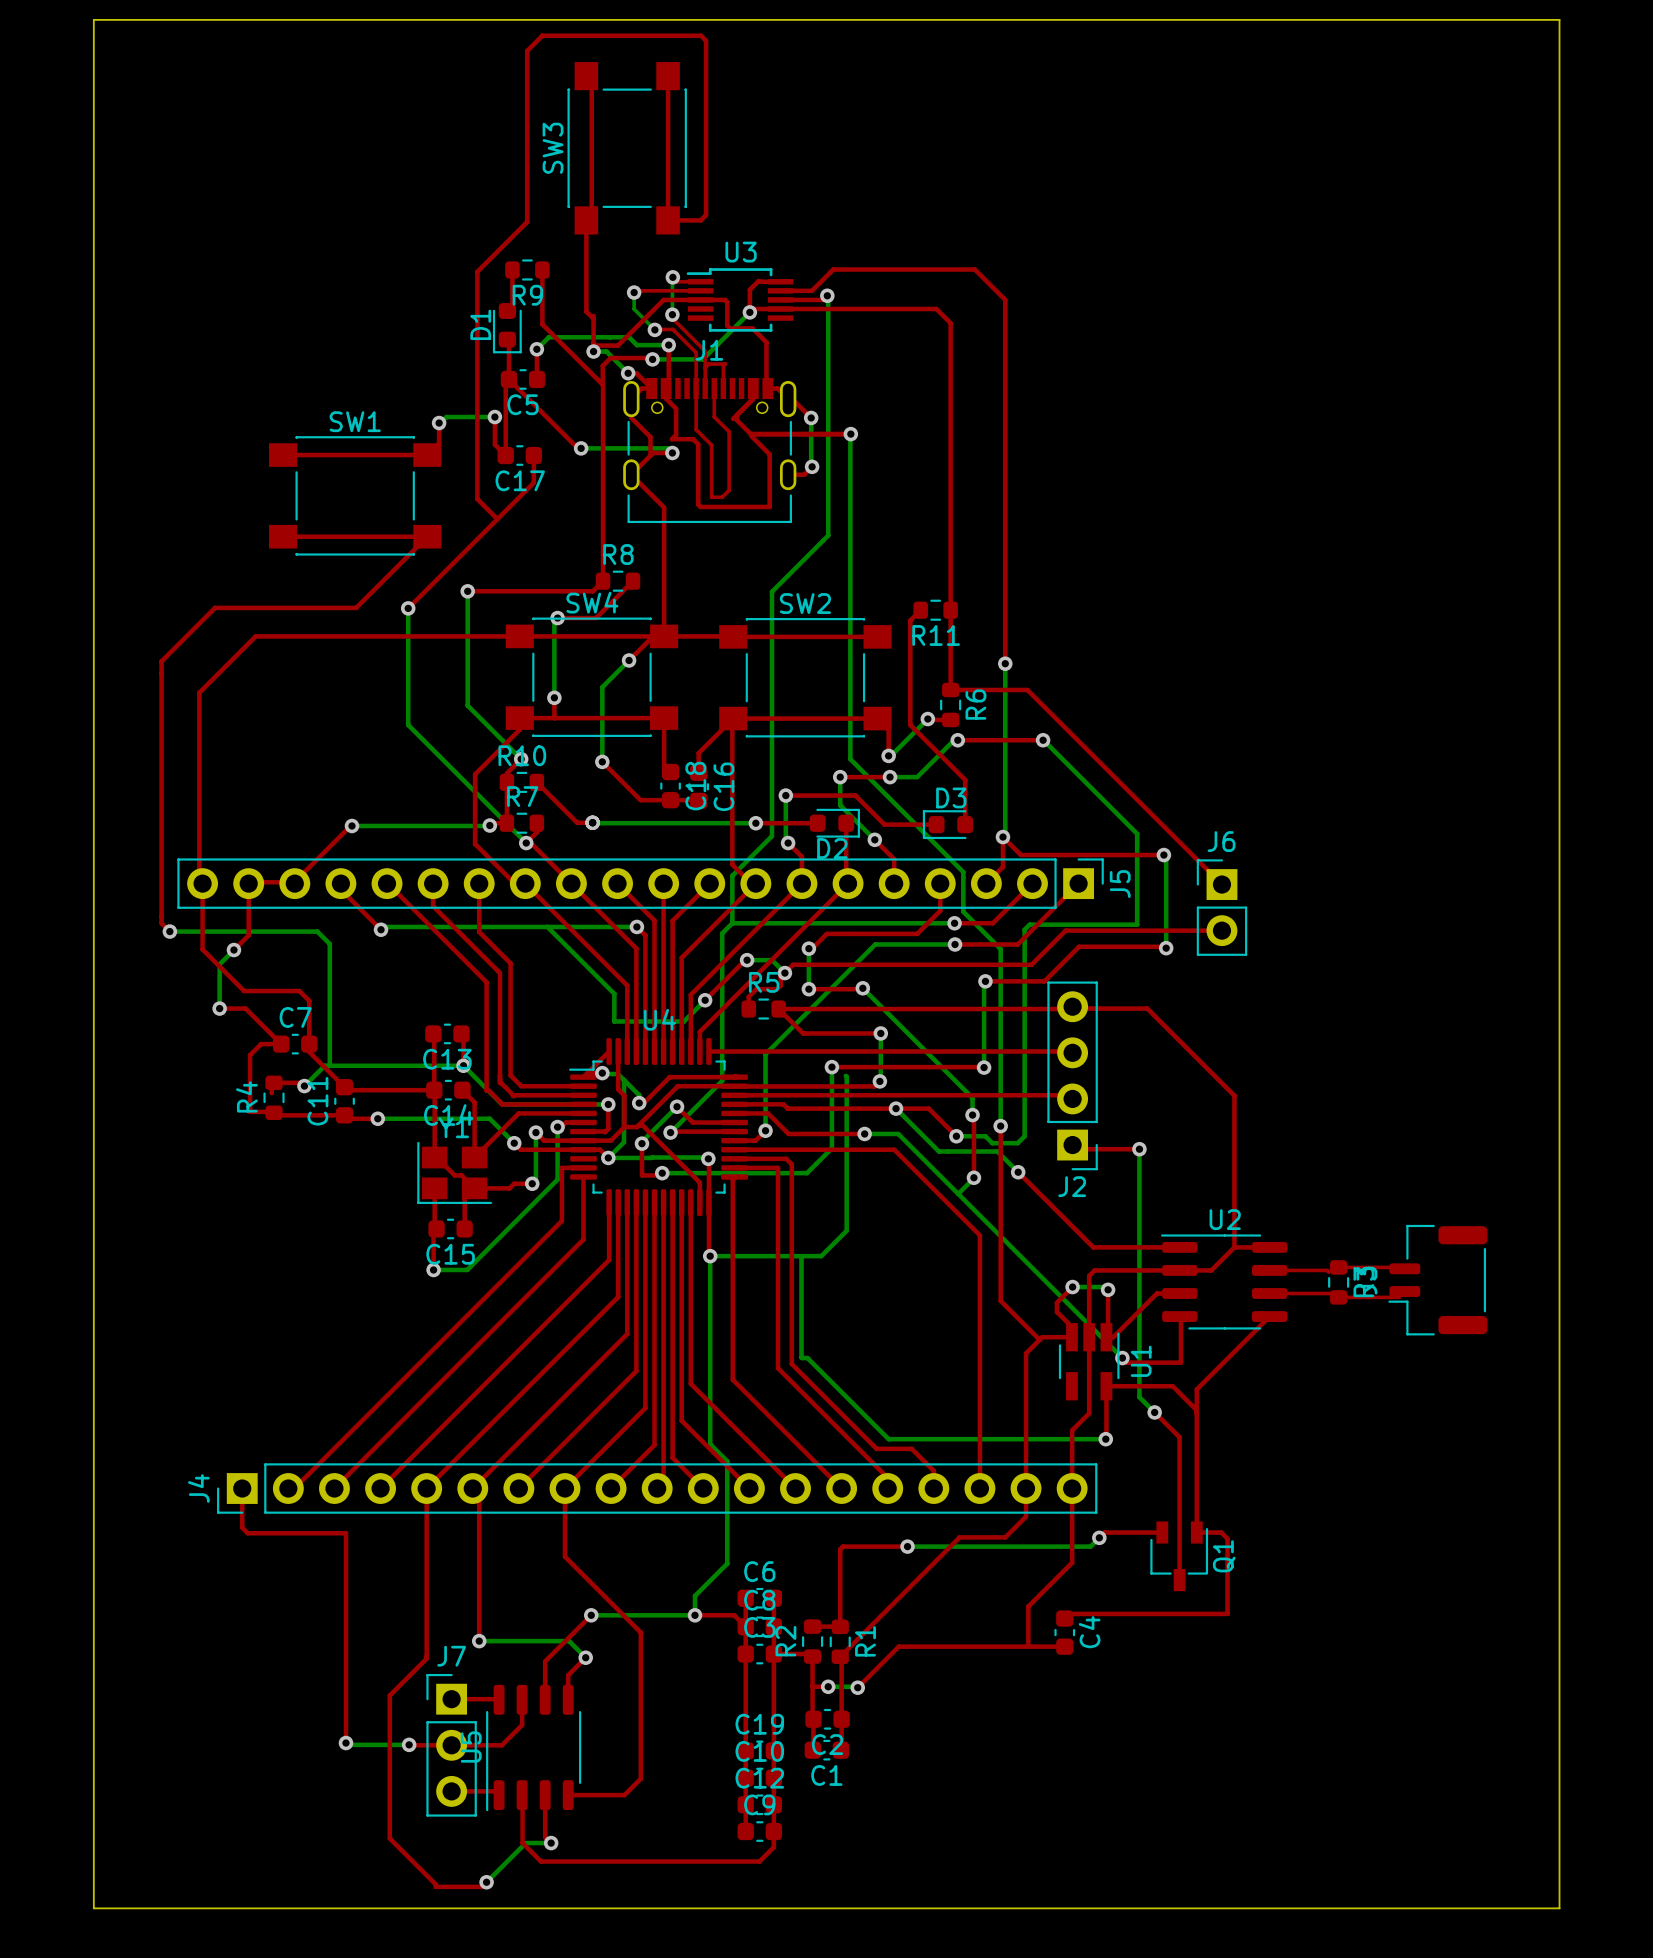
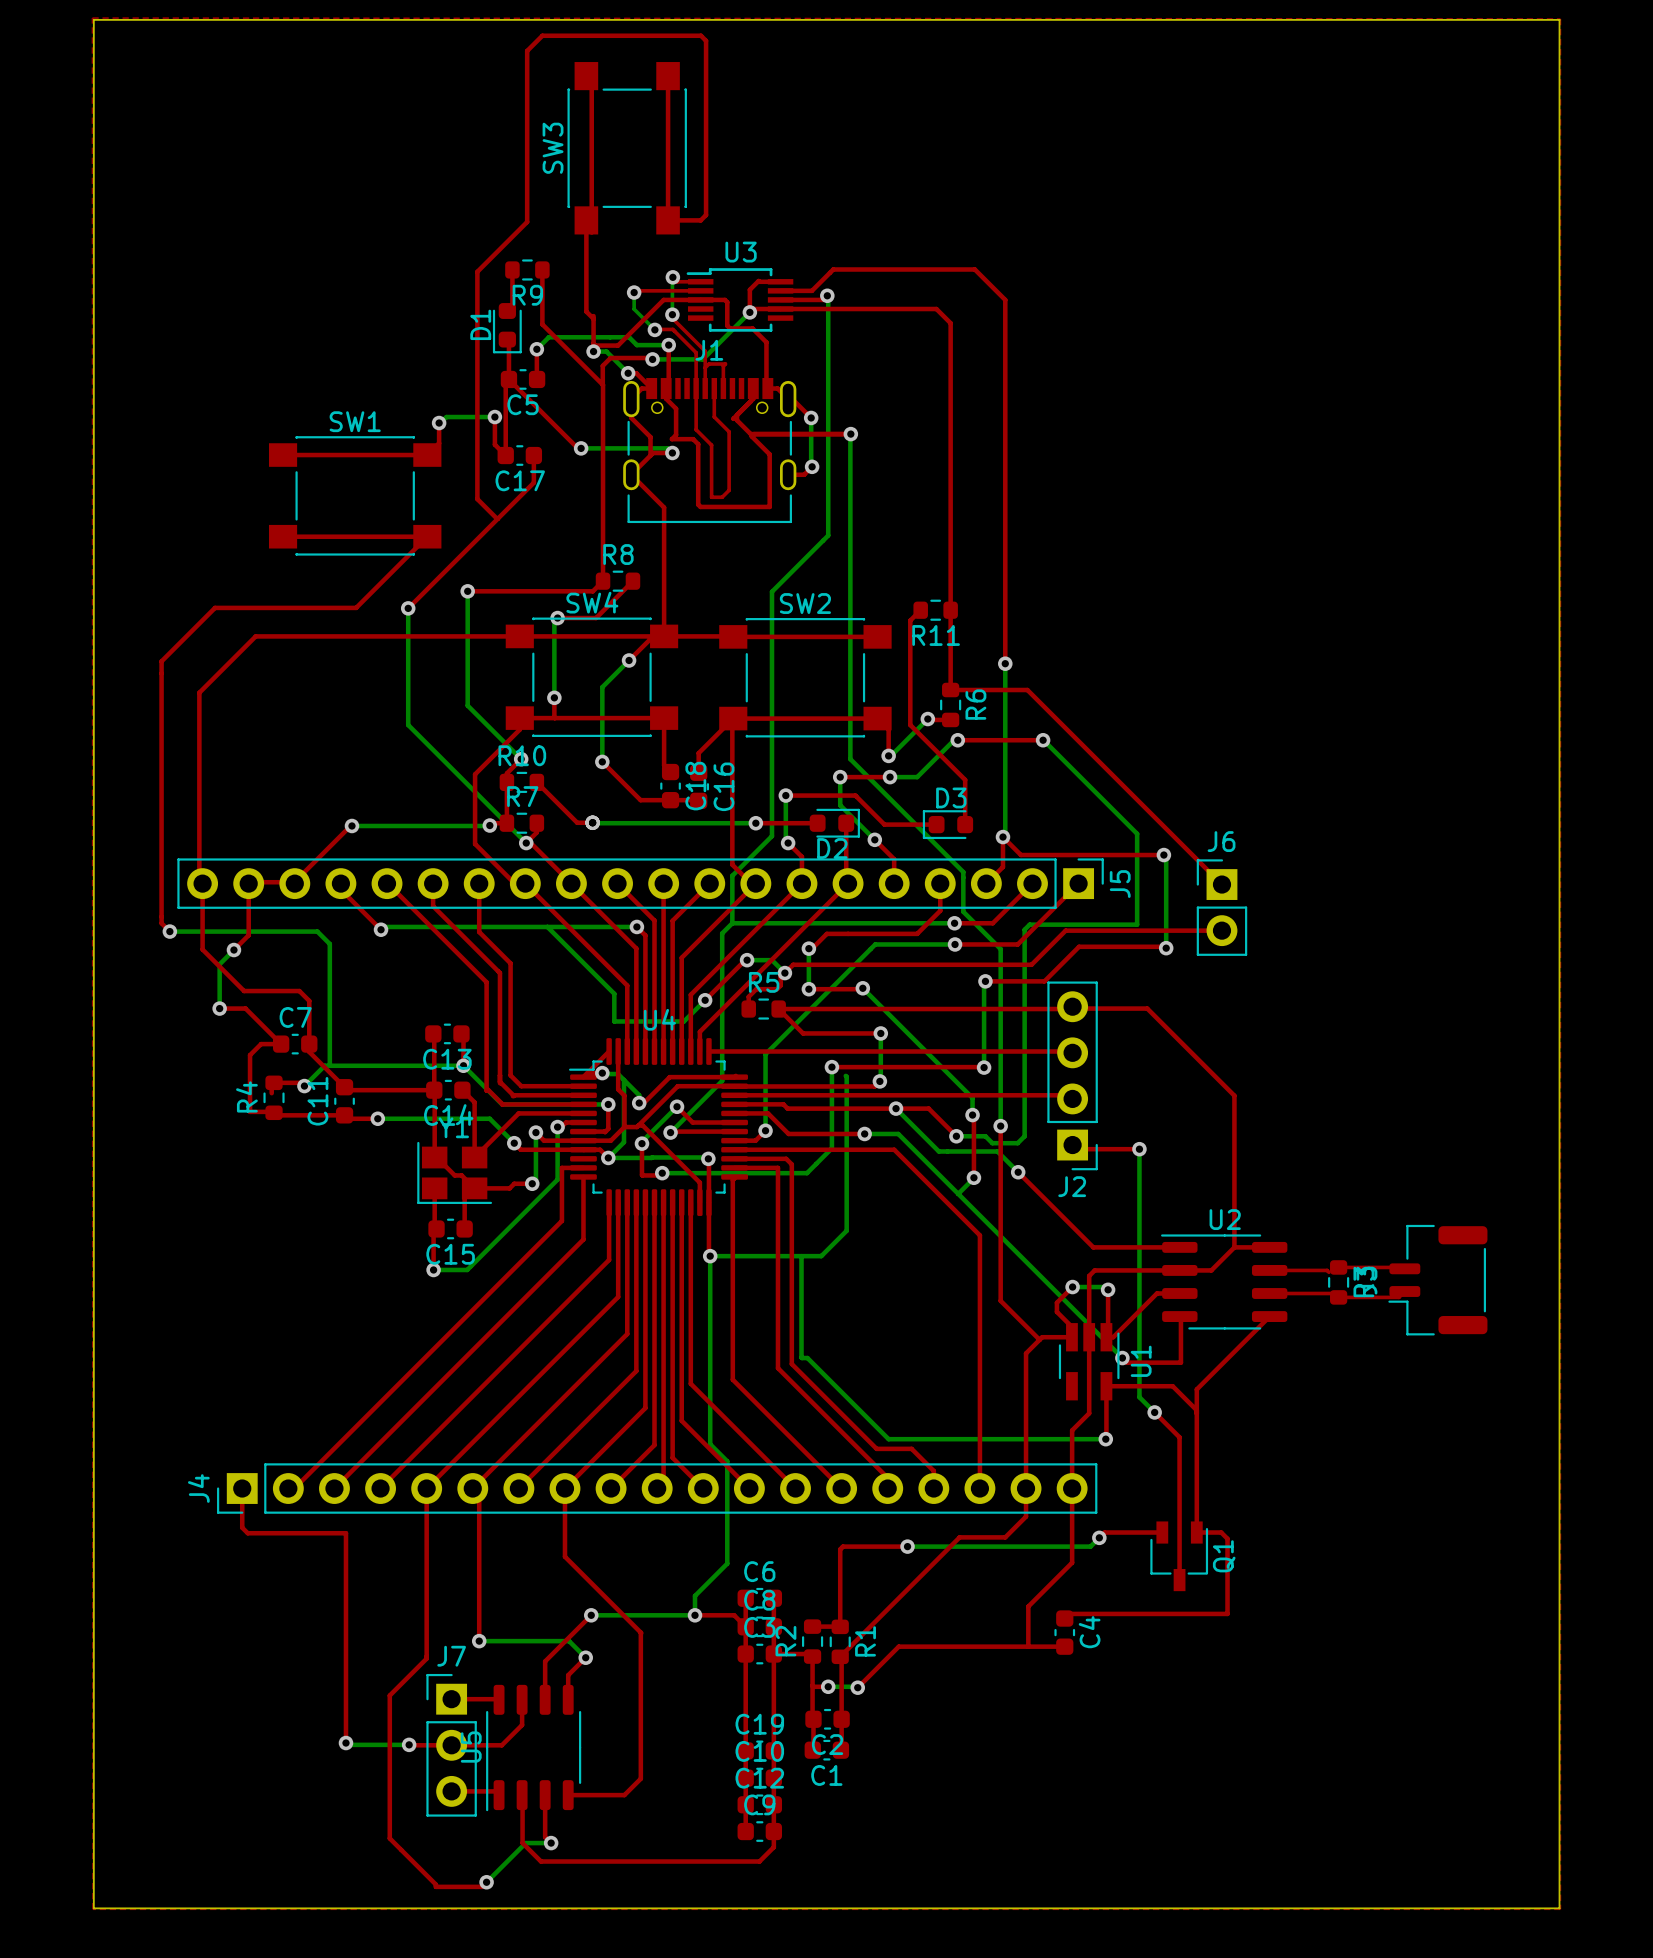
top zone outline: none -> (92, 18) (92, 1909) (1560, 1909) (1560, 18) (92, 18)

